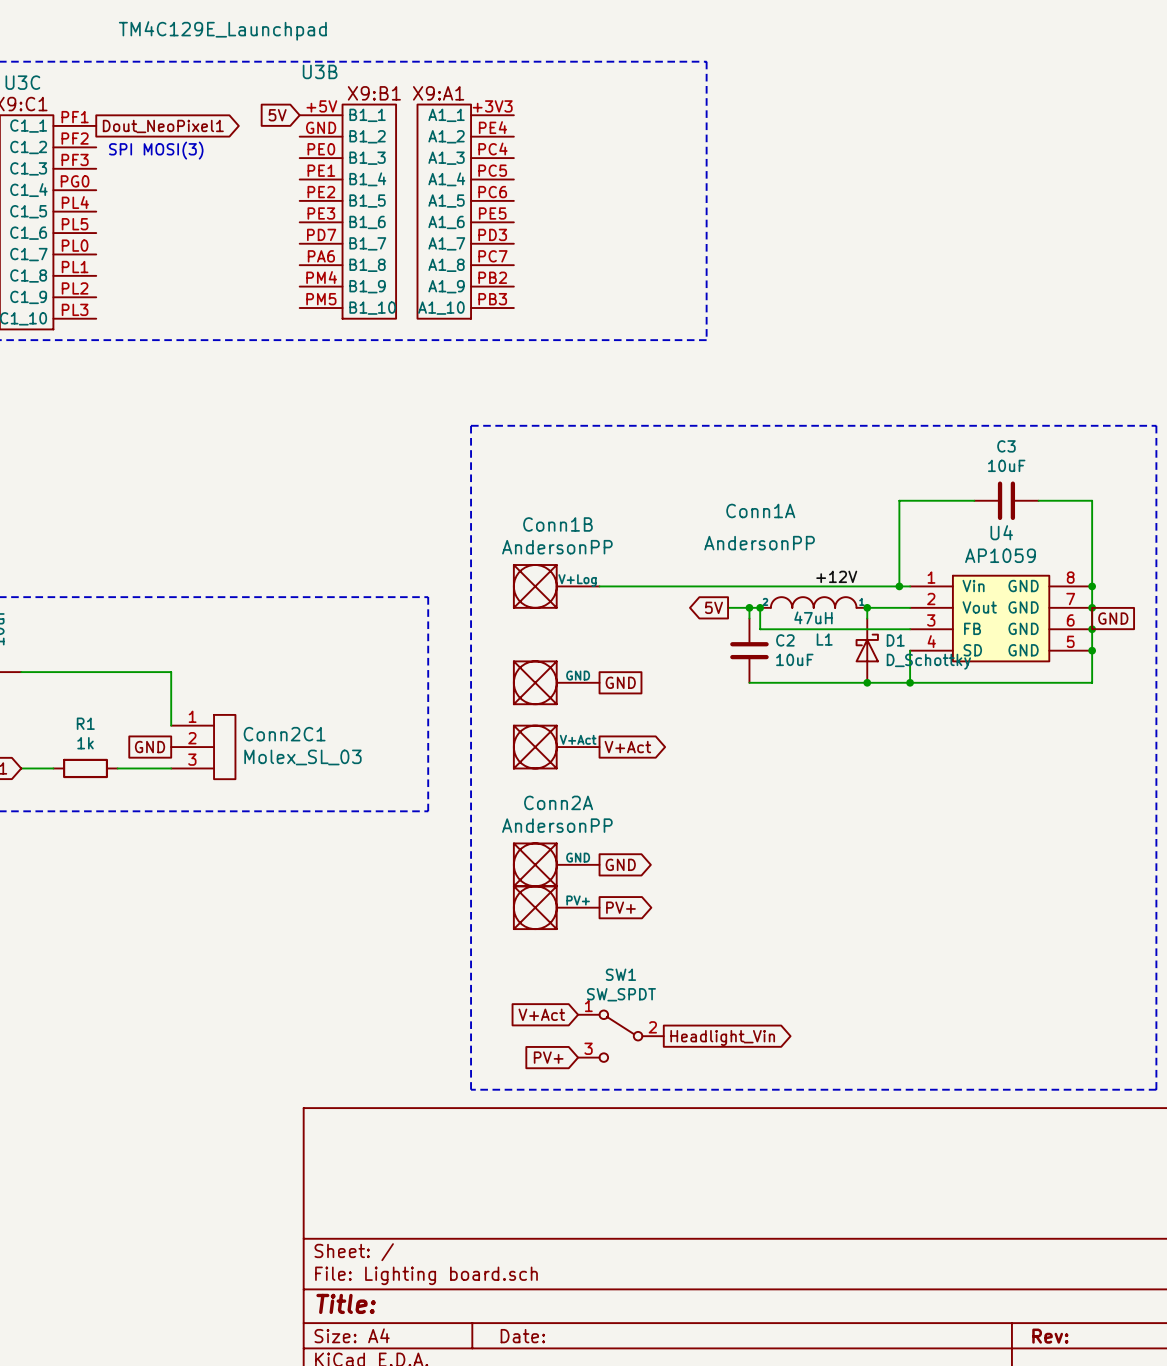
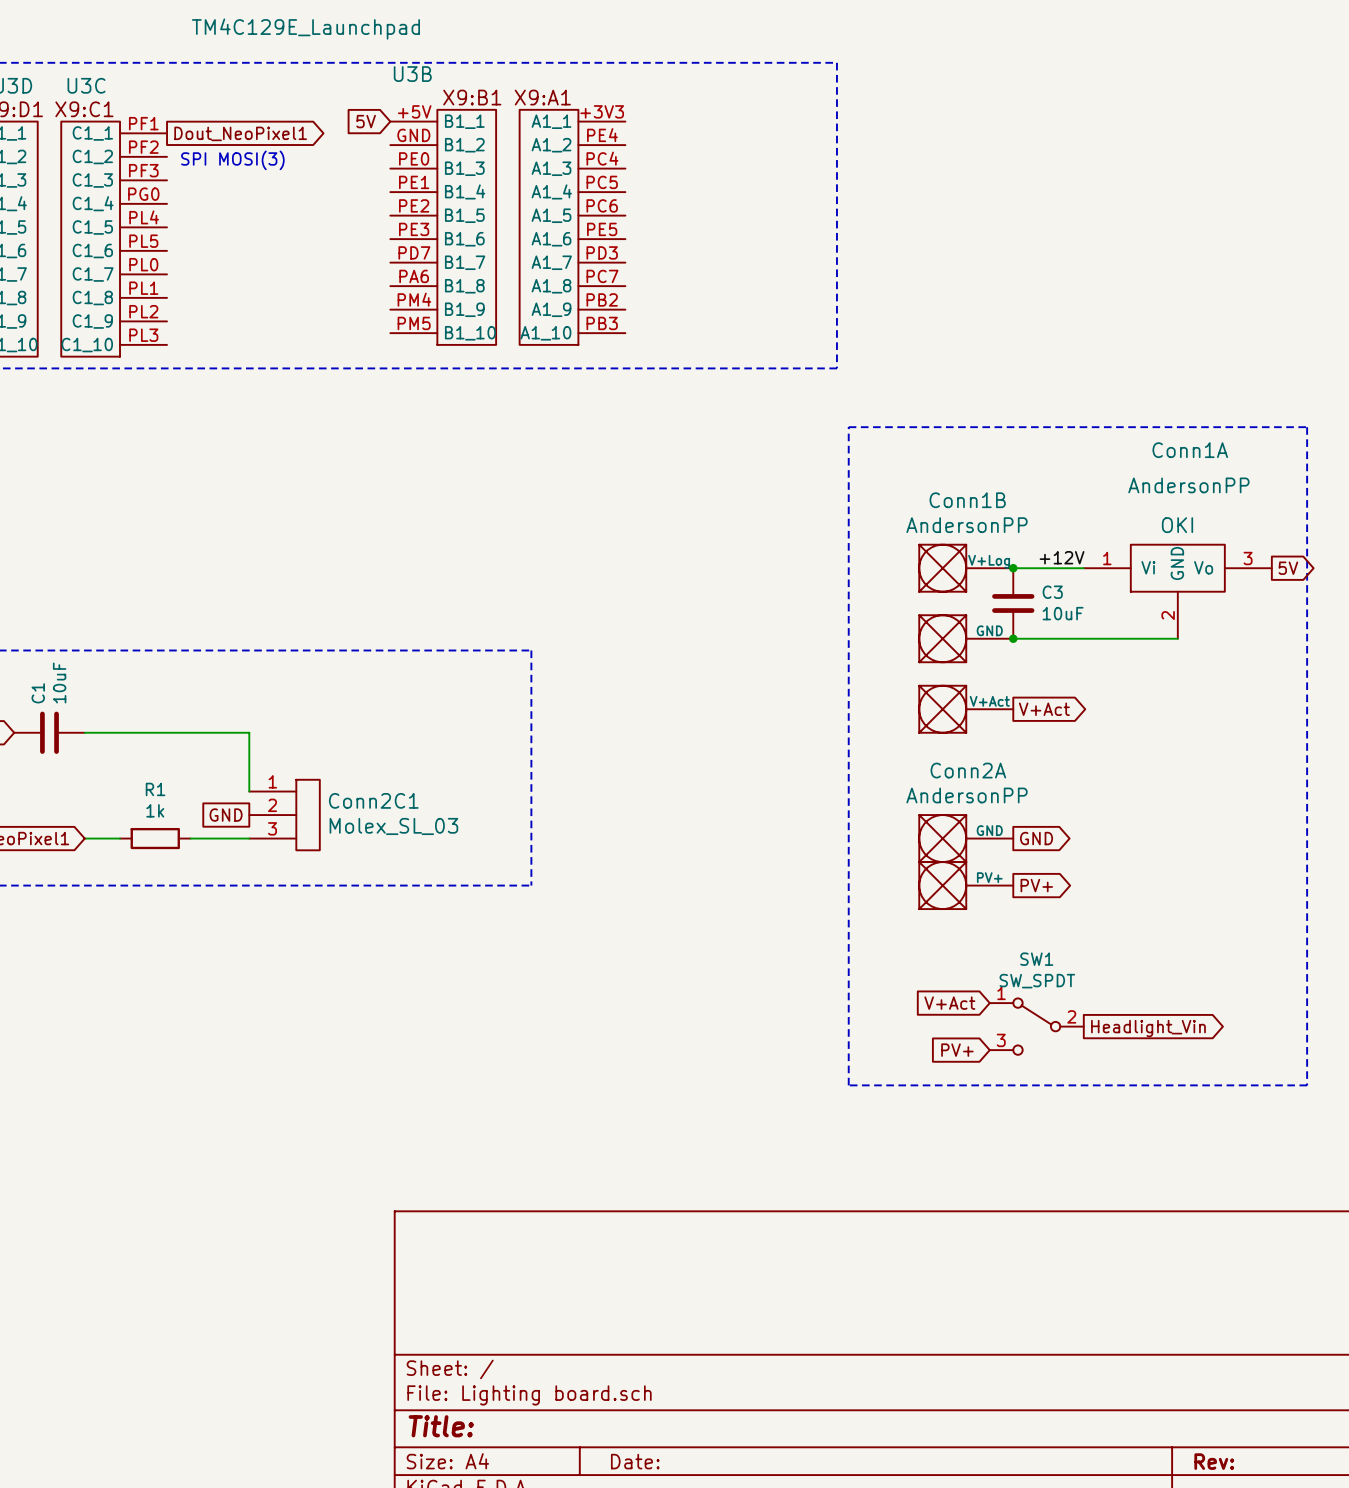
line: (471, 425) (471, 1089) (1156, 1089) (1156, 425) (471, 425) -> (848, 427) (848, 1085) (1307, 1085) (1307, 427) (848, 427)
C3 name position: C3 (1006, 446) -> C3 (1052, 592)
wire: (974, 500) (899, 500) (899, 586) -> none
C3 rotation: 0° (1006, 500) -> 90° clockwise (1013, 603)
C3 position: (1006, 500) -> (1013, 603)
wire: (1038, 500) (1092, 500) (1092, 682) (749, 682) -> none
wire: none -> (1013, 568) (1083, 568)
junction: none -> (1013, 568)
global label: none -> 5V (1288, 568)
part: none -> OKI (1177, 591)
label position: +12V (836, 576) -> +12V (1062, 557)
Conn1B position: (556, 586) -> (966, 568)
wire: (599, 586) (867, 586) -> none
junction: none -> (1013, 638)
junction: (899, 586) -> none
junction: (1092, 586) -> none
L1: 47uH (813, 602) -> none
global label: 5V (714, 607) -> none
wire: (728, 607) (760, 607) (760, 629) (910, 629) -> none
wire: (749, 607) (749, 618) -> none
junction: (749, 607) -> none
junction: (760, 607) -> none
junction: (867, 607) -> none
wire: (910, 607) (867, 607) (867, 618) -> none
junction: (1092, 607) -> none
U4: AP1059 (1001, 618) -> none
global label: GND (1113, 618) -> none
junction: (1092, 629) -> none
C2: 10uF (749, 650) -> none
part: none -> (966, 709)
D1: D_Schottky (867, 650) -> none
global label: none -> V+Act (1044, 709)
wire: (910, 650) (910, 682) -> none
junction: (1092, 650) -> none
Conn1A position: (556, 682) -> (966, 638)
global label: GND (620, 682) -> none
junction: (867, 682) -> none
junction: (910, 682) -> none
part: (556, 747) -> none
global label: V+Act (627, 747) -> none
global label: none -> GND (1036, 838)
part: none -> (966, 885)
global label: none -> PV+ (1036, 885)
Conn2A position: (556, 864) -> (966, 838)
global label: GND (620, 864) -> none
part: (556, 907) -> none
global label: PV+ (620, 907) -> none
global label: none -> V+Act (949, 1003)
global label: none -> Headlight_Vin (1148, 1028)
global label: none -> PV+ (957, 1050)
global label: V+Act (541, 1014) -> none
SW1 position: (620, 1036) -> (1036, 1026)
global label: Headlight_Vin (722, 1037) -> none
global label: PV+ (548, 1057) -> none

